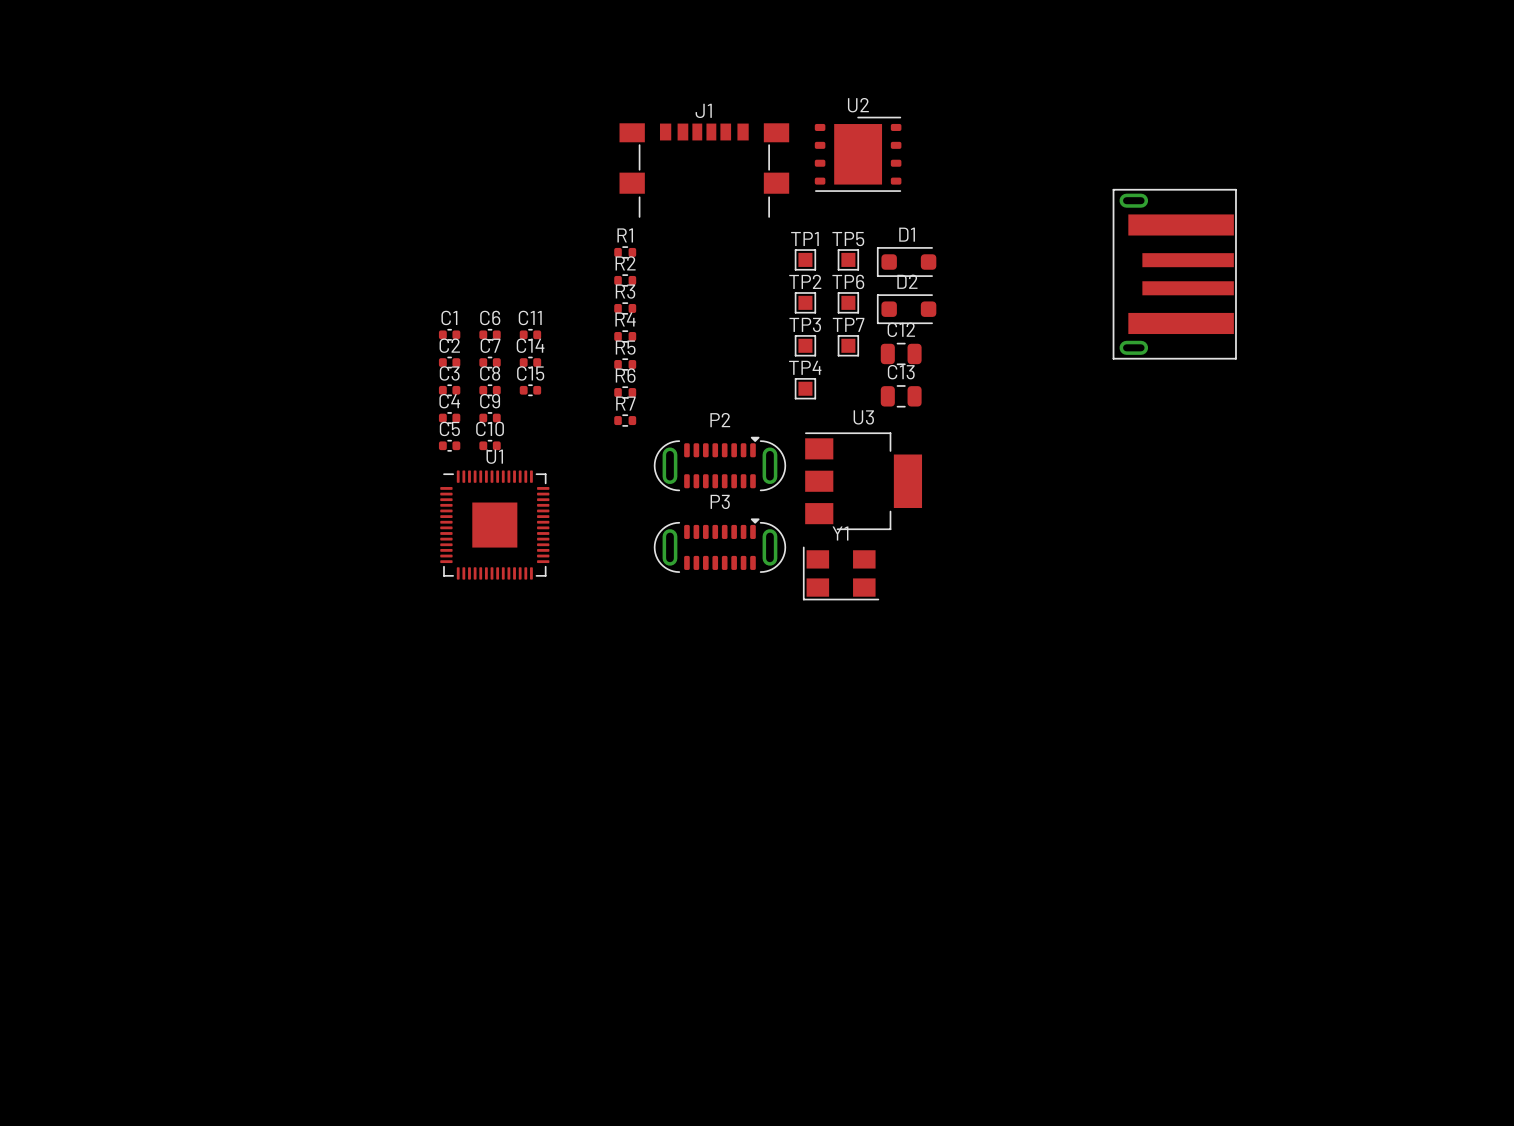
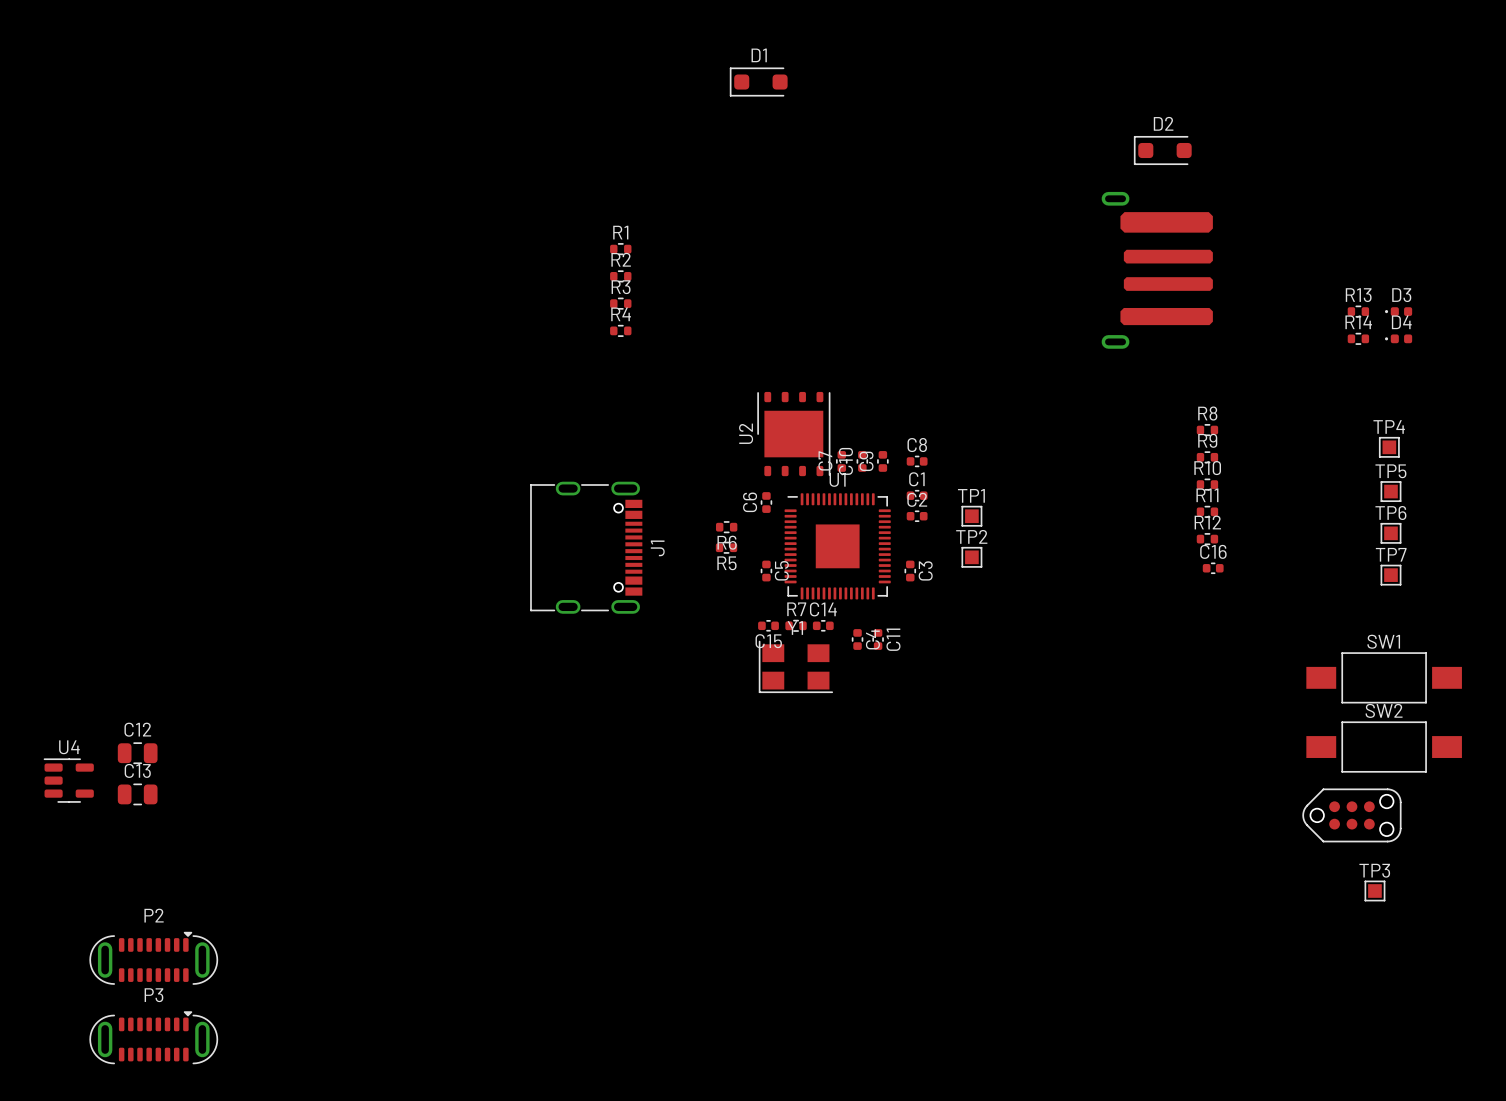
J1 name position: J1 (703, 110) -> J1 (657, 548)
J1 footprint: [619, 123, 790, 218] -> [530, 481, 643, 614]
U2 rotation: 0° (858, 154) -> 90° counterclockwise (793, 434)
U2 position: (858, 154) -> (793, 434)
part footprint: [1112, 188, 1237, 360] -> [1120, 212, 1213, 326]
TP1 position: (805, 259) -> (971, 516)
TP5 position: (848, 259) -> (1390, 491)
D1 position: (906, 262) -> (758, 82)
TP2 position: (805, 302) -> (971, 557)
TP6 position: (848, 302) -> (1390, 533)
D2 position: (906, 309) -> (1162, 150)
R13: none -> (1358, 311)
D3: none -> (1398, 311)
C1 position: (449, 334) -> (917, 495)
C6 rotation: 0° (490, 334) -> 90° clockwise (766, 502)
C6 position: (490, 334) -> (766, 502)
C11 rotation: 0° (530, 334) -> 90° clockwise (878, 639)
C11 position: (530, 334) -> (878, 639)
R14: none -> (1358, 338)
D4: none -> (1398, 338)
TP3 position: (805, 345) -> (1374, 890)
TP7 position: (848, 345) -> (1390, 575)
R5 name position: R5 (625, 347) -> R5 (726, 563)
C12 position: (901, 353) -> (137, 753)
C2 position: (449, 362) -> (917, 516)
C7 rotation: 0° (490, 362) -> 90° clockwise (841, 461)
C7 position: (490, 362) -> (841, 461)
C14 position: (530, 362) -> (823, 625)
R5 position: (625, 364) -> (726, 547)
C15 name position: C15 (530, 373) -> C15 (768, 641)
R6 name position: R6 (625, 375) -> R6 (727, 542)
TP4 position: (805, 388) -> (1389, 447)
C3 rotation: 0° (449, 390) -> 90° clockwise (910, 571)
C3 position: (449, 390) -> (910, 571)
C8 position: (490, 390) -> (917, 461)
C15 position: (530, 390) -> (768, 625)
R6 position: (625, 392) -> (726, 527)
C13 position: (901, 396) -> (137, 794)
C4 rotation: 0° (449, 418) -> 90° clockwise (857, 639)
C4 position: (449, 418) -> (857, 639)
C9 rotation: 0° (490, 418) -> 90° clockwise (882, 461)
C9 position: (490, 418) -> (882, 461)
R7 position: (625, 420) -> (796, 625)
R8: none -> (1207, 430)
C5 rotation: 0° (449, 445) -> 90° clockwise (766, 571)
C5 position: (449, 445) -> (766, 571)
C10 rotation: 0° (490, 445) -> 90° clockwise (862, 461)
C10 position: (490, 445) -> (862, 461)
P2 position: (719, 464) -> (153, 958)
R9: none -> (1207, 457)
U3: (863, 481) -> none
R10: none -> (1207, 484)
R11: none -> (1207, 511)
U1 position: (494, 525) -> (837, 546)
P3 position: (719, 545) -> (153, 1037)
R12: none -> (1207, 539)
Y1 position: (841, 573) -> (795, 666)
C16: none -> (1213, 568)
SW1: none -> (1384, 677)
SW2: none -> (1384, 747)
U4: none -> (68, 780)
part: none -> (1351, 815)

